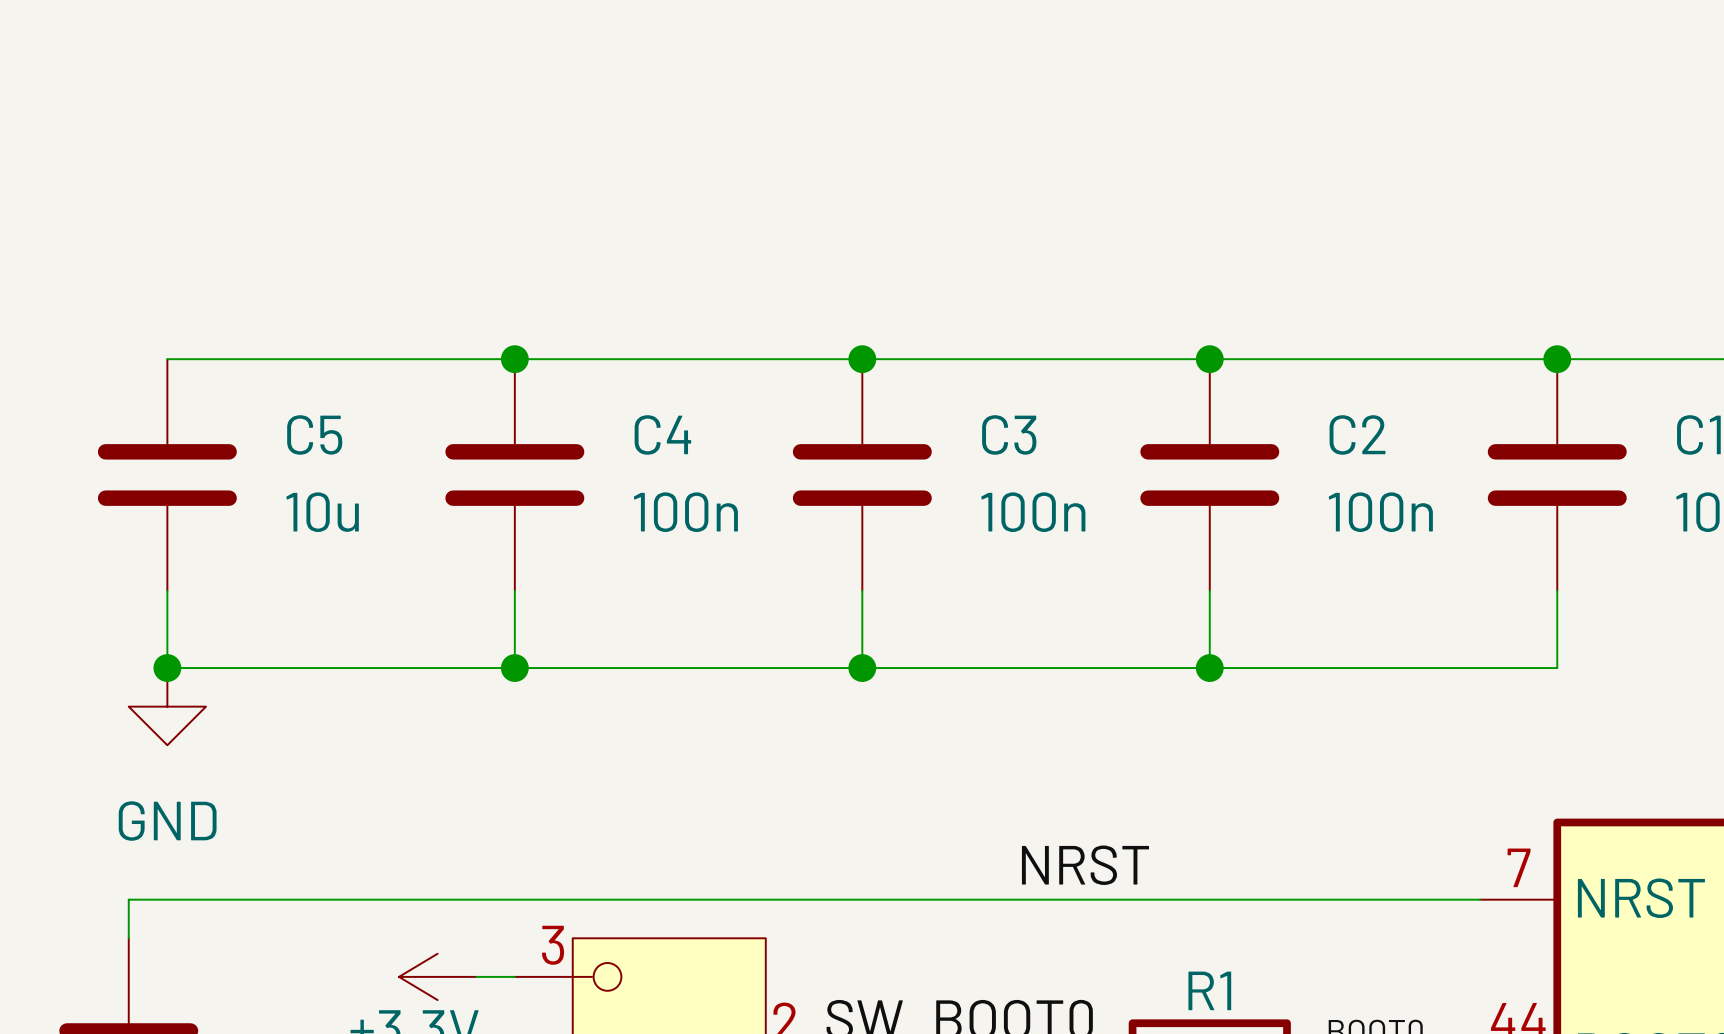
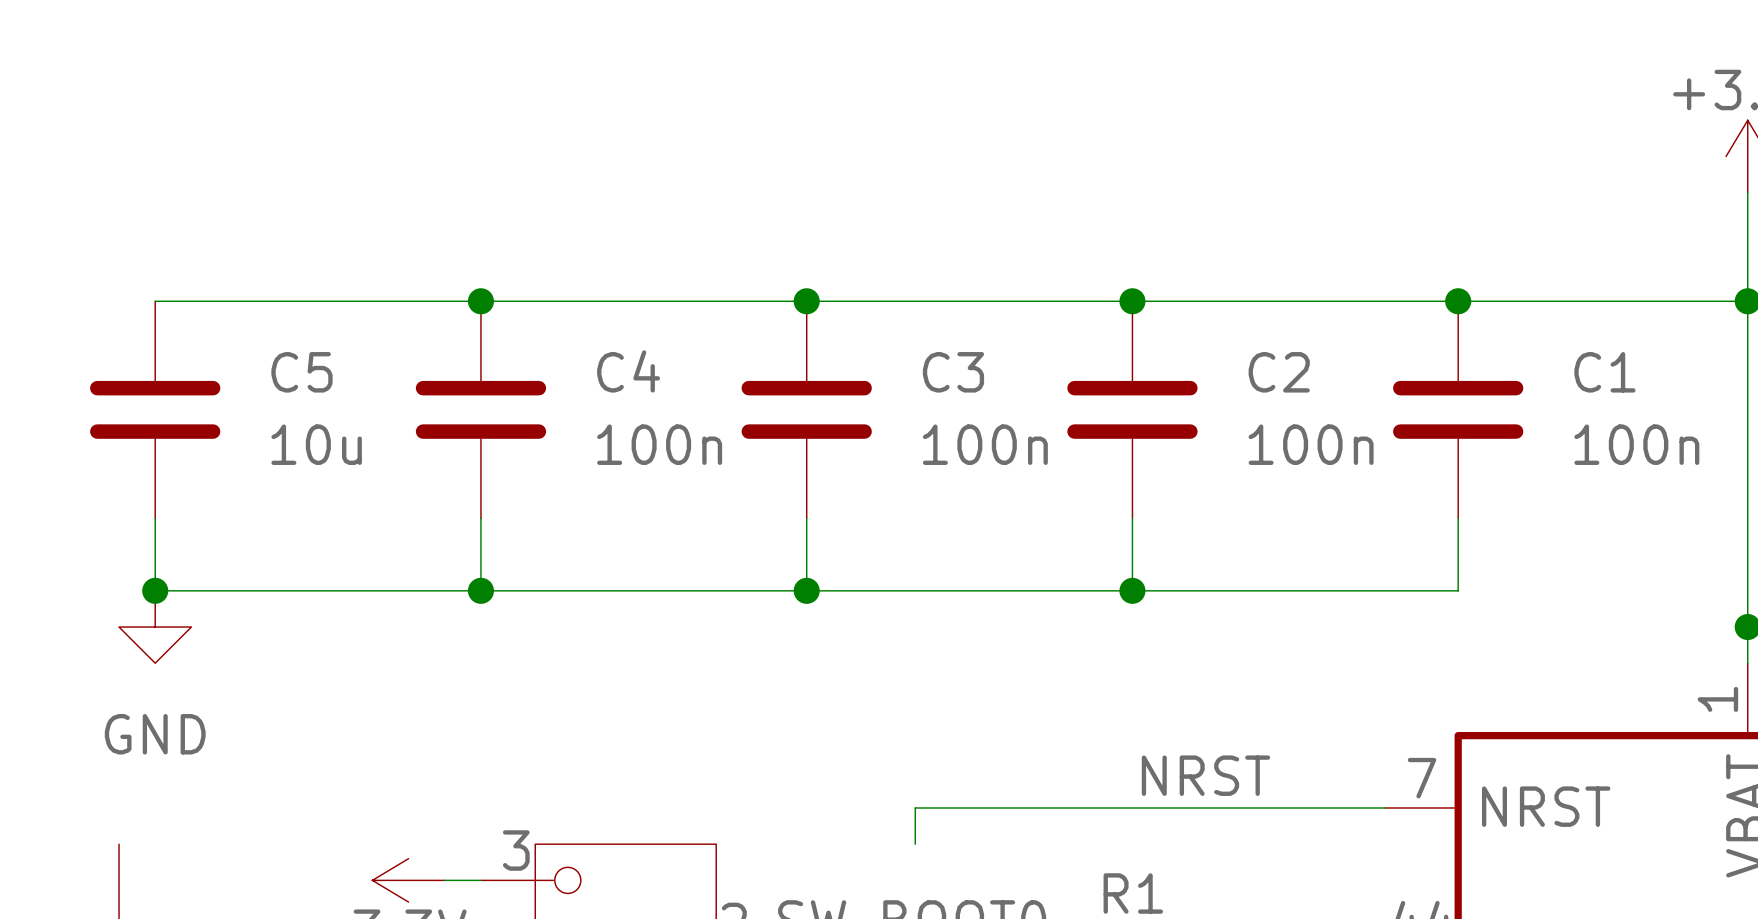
label position: NRST (1085, 865) -> NRST (1205, 775)
wire: (978, 899) (128, 899) (128, 938) -> (915, 807) (915, 844)

